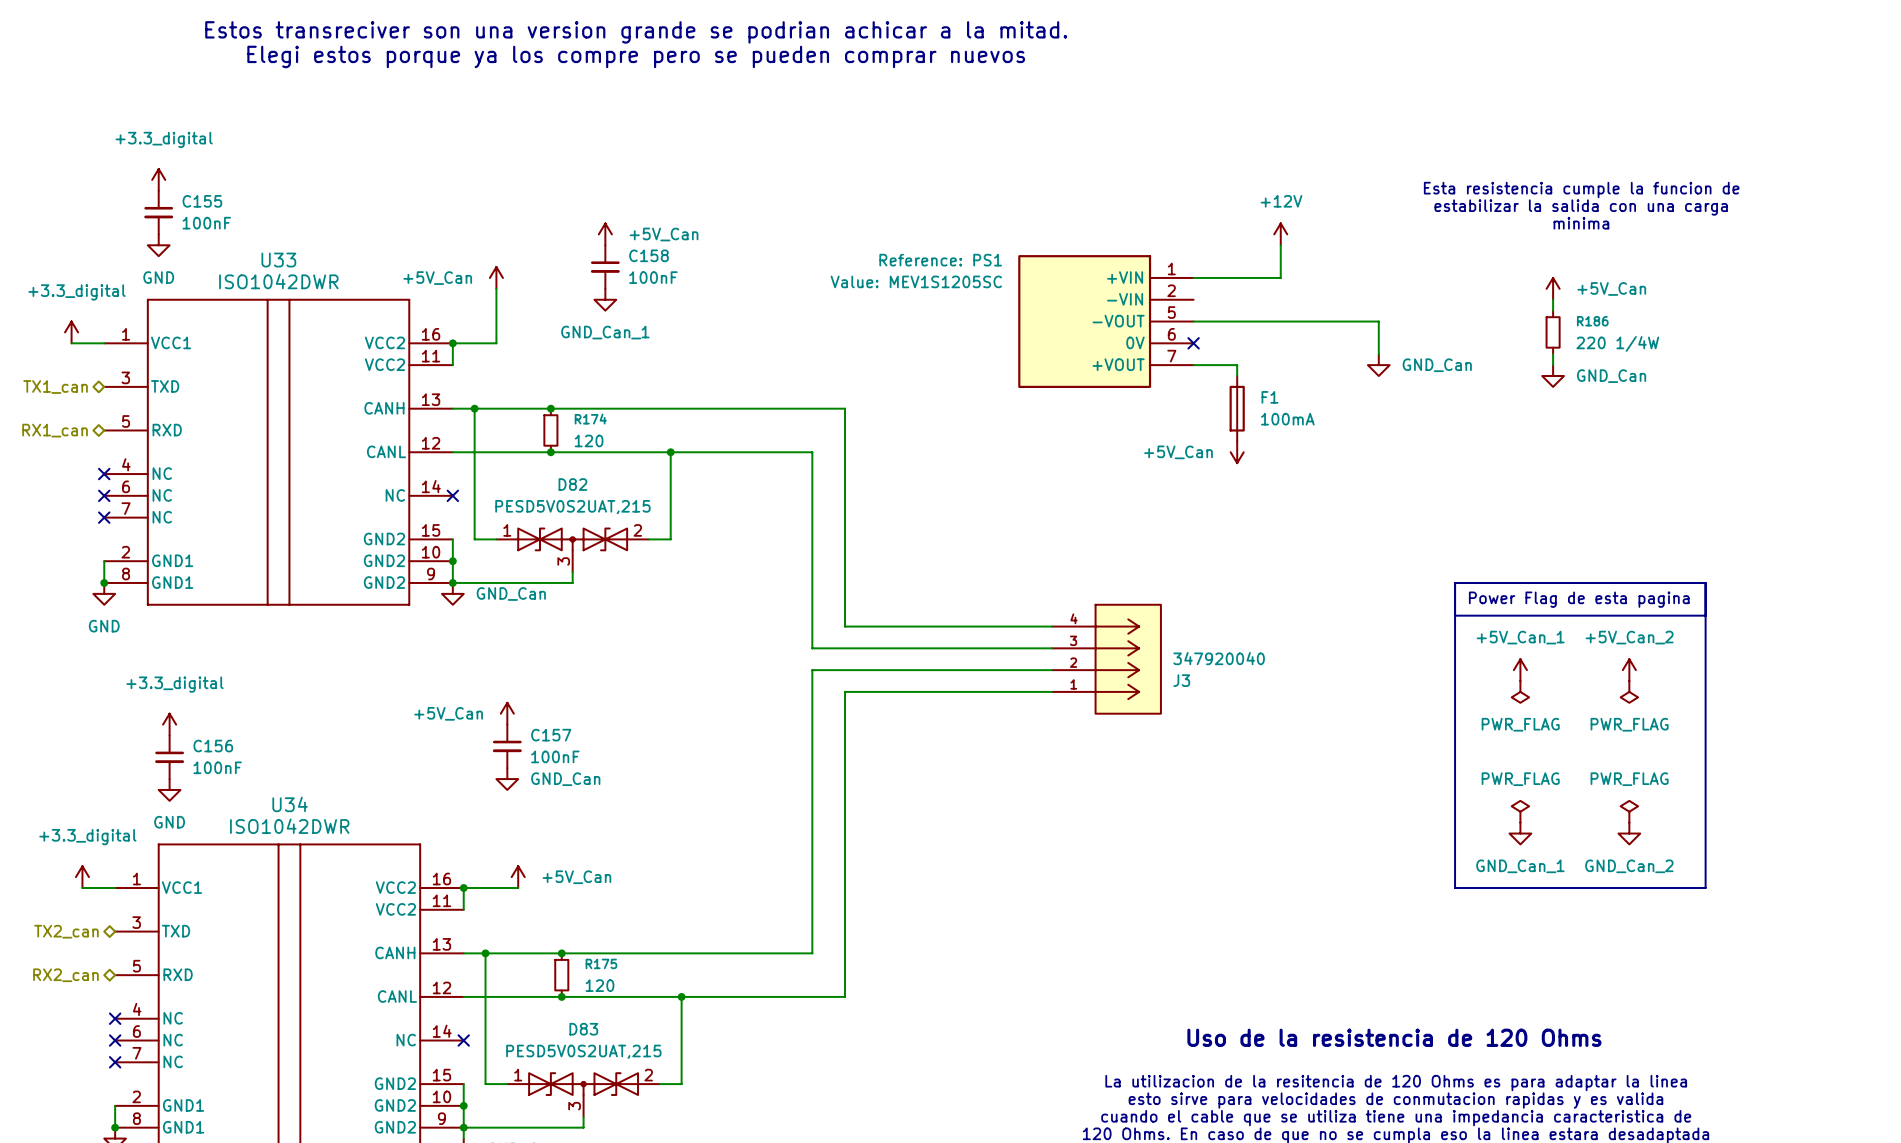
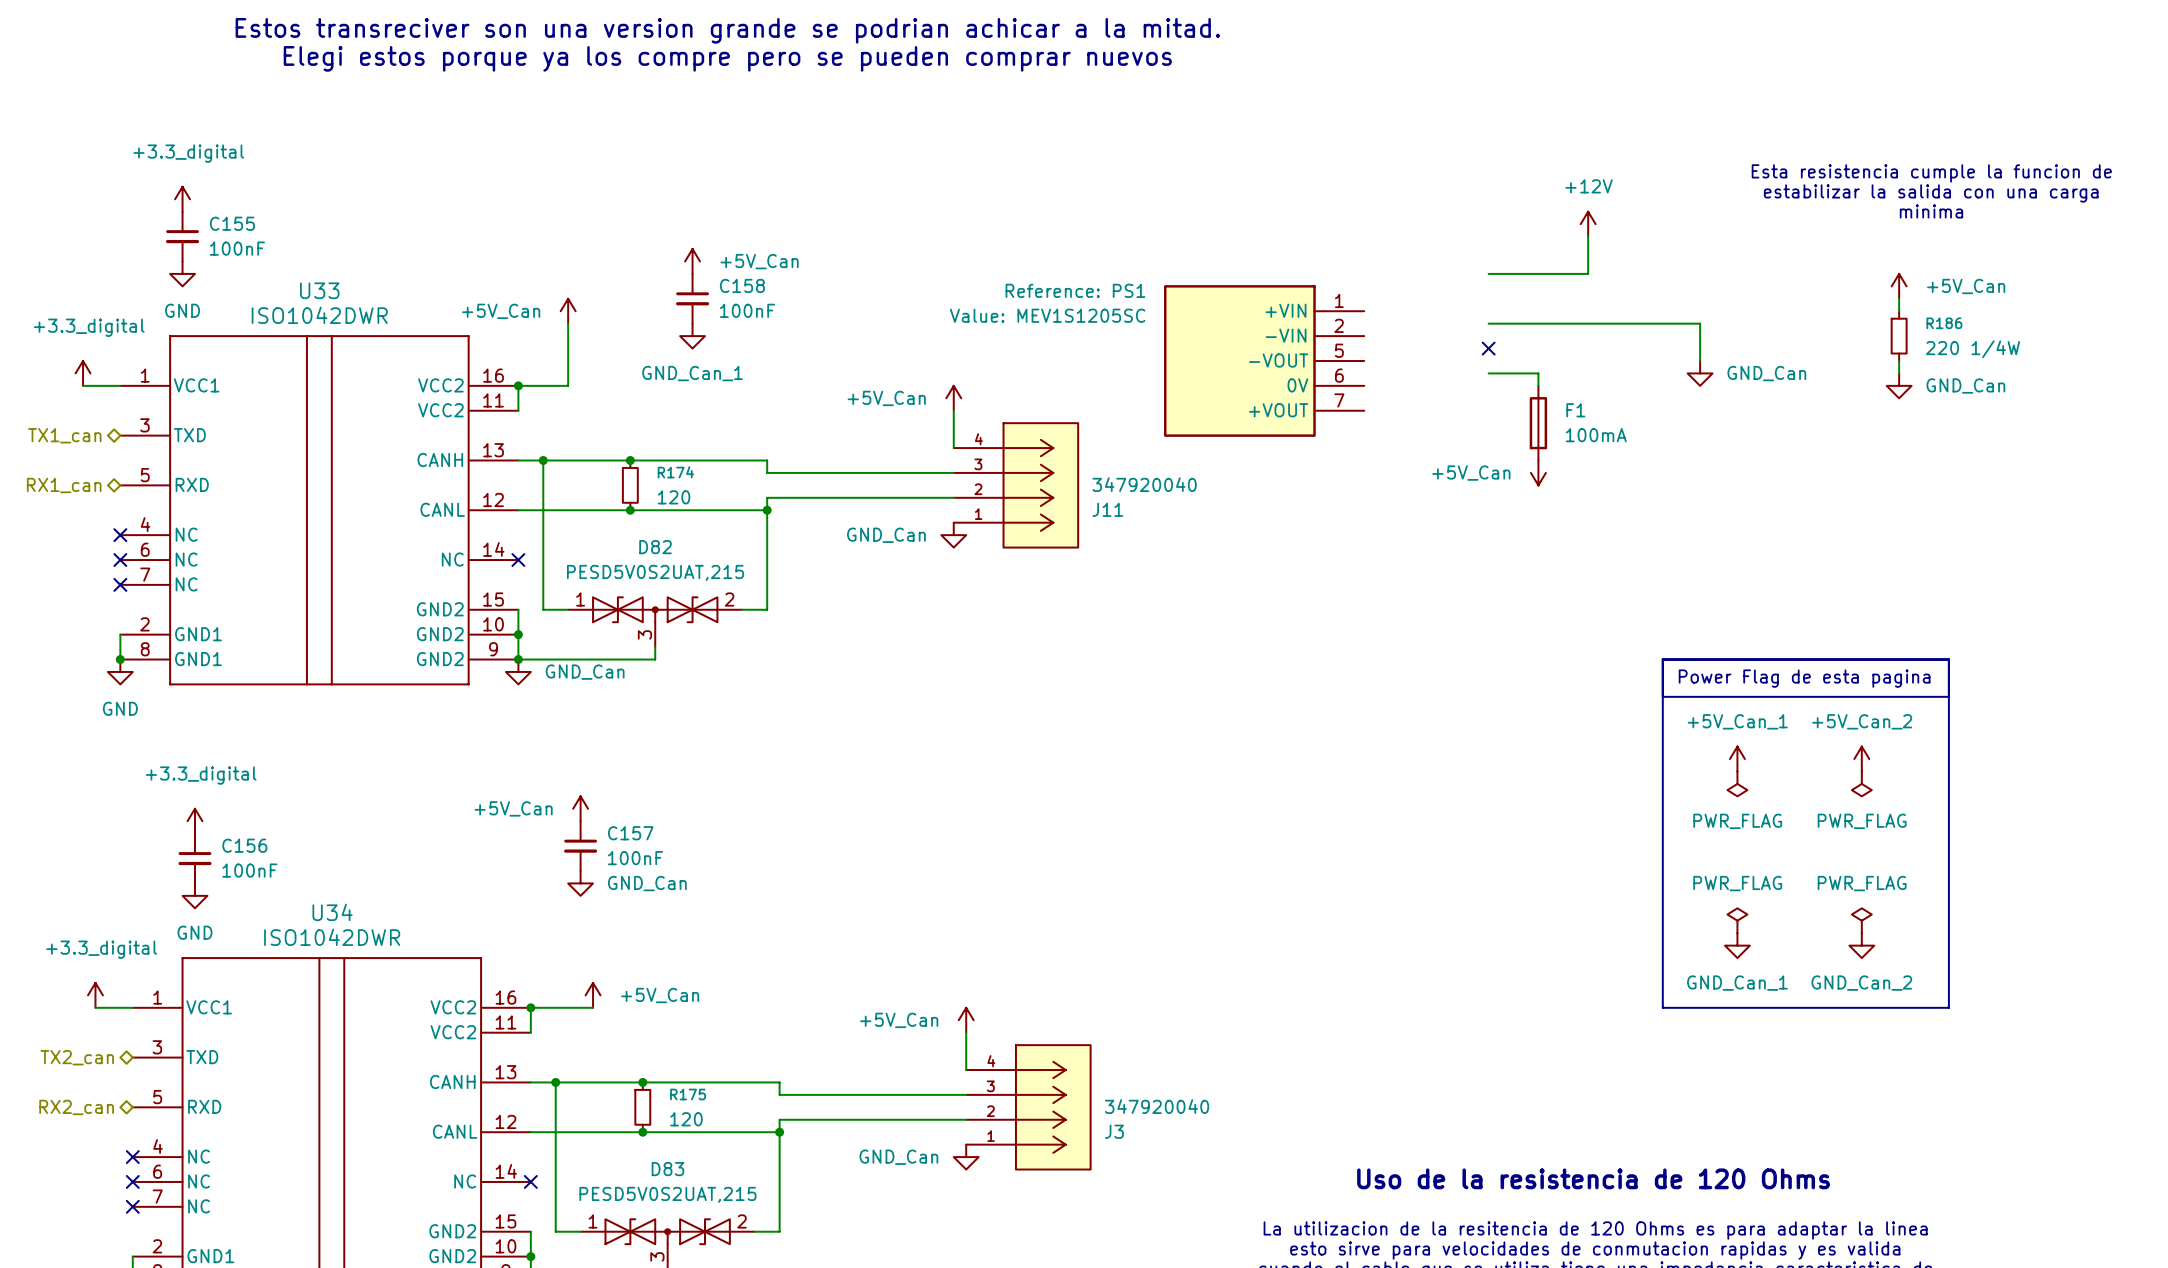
text position: Esta resistencia cumple la funcion de (1581, 189) -> Esta resistencia cumple la funcion de (1931, 173)
text position: estabilizar la salida con una carga (1581, 207) -> estabilizar la salida con una carga (1931, 193)
text position: minima (1581, 223) -> minima (1931, 211)
power symbol position: +12V (1280, 234) -> +12V (1588, 224)
wire: (1280, 245) (1280, 277) (1193, 277) -> (1588, 236) (1588, 273) (1488, 273)
power symbol position: +5V_Can (1553, 288) -> +5V_Can (1899, 286)
wire: (1553, 299) (1553, 310) -> (1899, 298) (1899, 311)
no-connect mark: none -> (1488, 348)
wire: (1193, 321) (1378, 321) (1378, 354) -> (1488, 323) (1700, 323) (1700, 360)
power symbol: none -> GND_Can (1700, 373)
R186 position: (1553, 332) -> (1899, 336)
no-connect mark: (1193, 343) -> none
power symbol: none -> GND_Can (1899, 385)
power symbol: none -> +5V_Can (953, 398)
wire: (1553, 354) (1553, 365) -> (1899, 360) (1899, 373)
wire: none -> (953, 410) (953, 448)
wire: (1193, 365) (1237, 365) (1237, 376) -> (1488, 373) (1538, 373) (1538, 385)
power symbol: GND_Can (1378, 365) -> none
power symbol: GND_Can (1553, 376) -> none
wire: (670, 408) (845, 408) (845, 626) (1051, 626) -> (767, 460) (767, 472) (953, 472)
F1 position: (1237, 408) -> (1538, 423)
J11: none -> 347920040 (1016, 485)
wire: (670, 452) (812, 452) (812, 648) (1051, 648) -> (767, 510) (767, 497) (953, 497)
power symbol position: +5V_Can (1237, 452) -> +5V_Can (1538, 472)
power symbol: none -> GND_Can (953, 535)
J3 position: (1106, 659) -> (1028, 1107)
wire: (1051, 670) (812, 670) (812, 953) (681, 953) -> (966, 1094) (779, 1094) (779, 1082)
wire: (1051, 691) (845, 691) (845, 909) -> none
power symbol: none -> +5V_Can (966, 1020)
wire: (845, 942) (845, 996) (681, 996) -> (966, 1119) (779, 1119) (779, 1132)
power symbol: none -> GND_Can (966, 1157)

